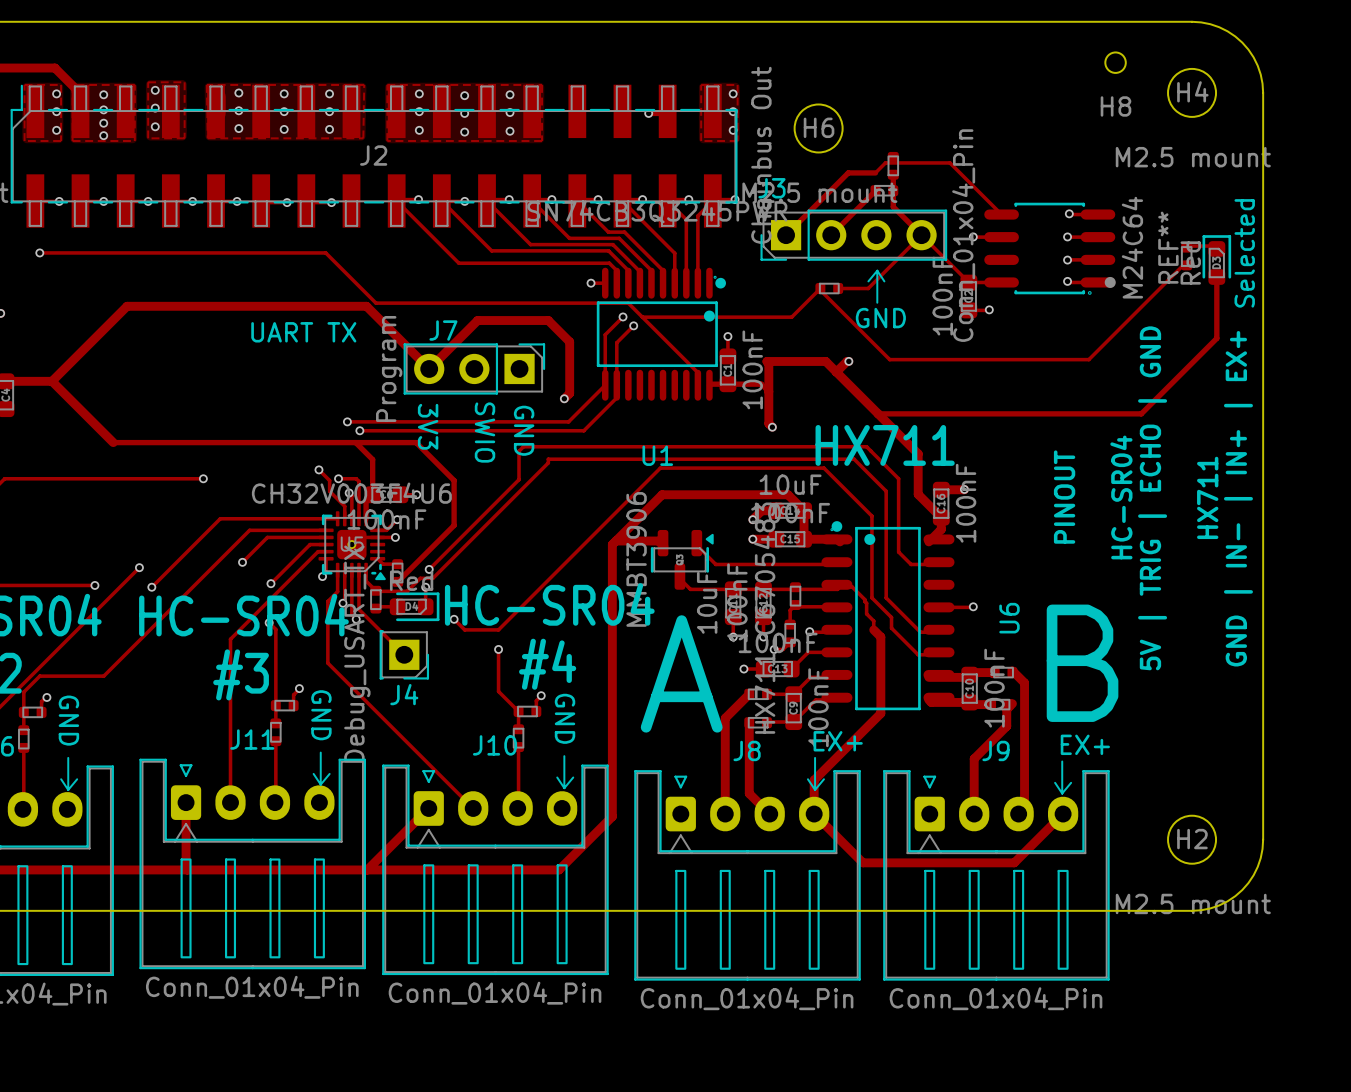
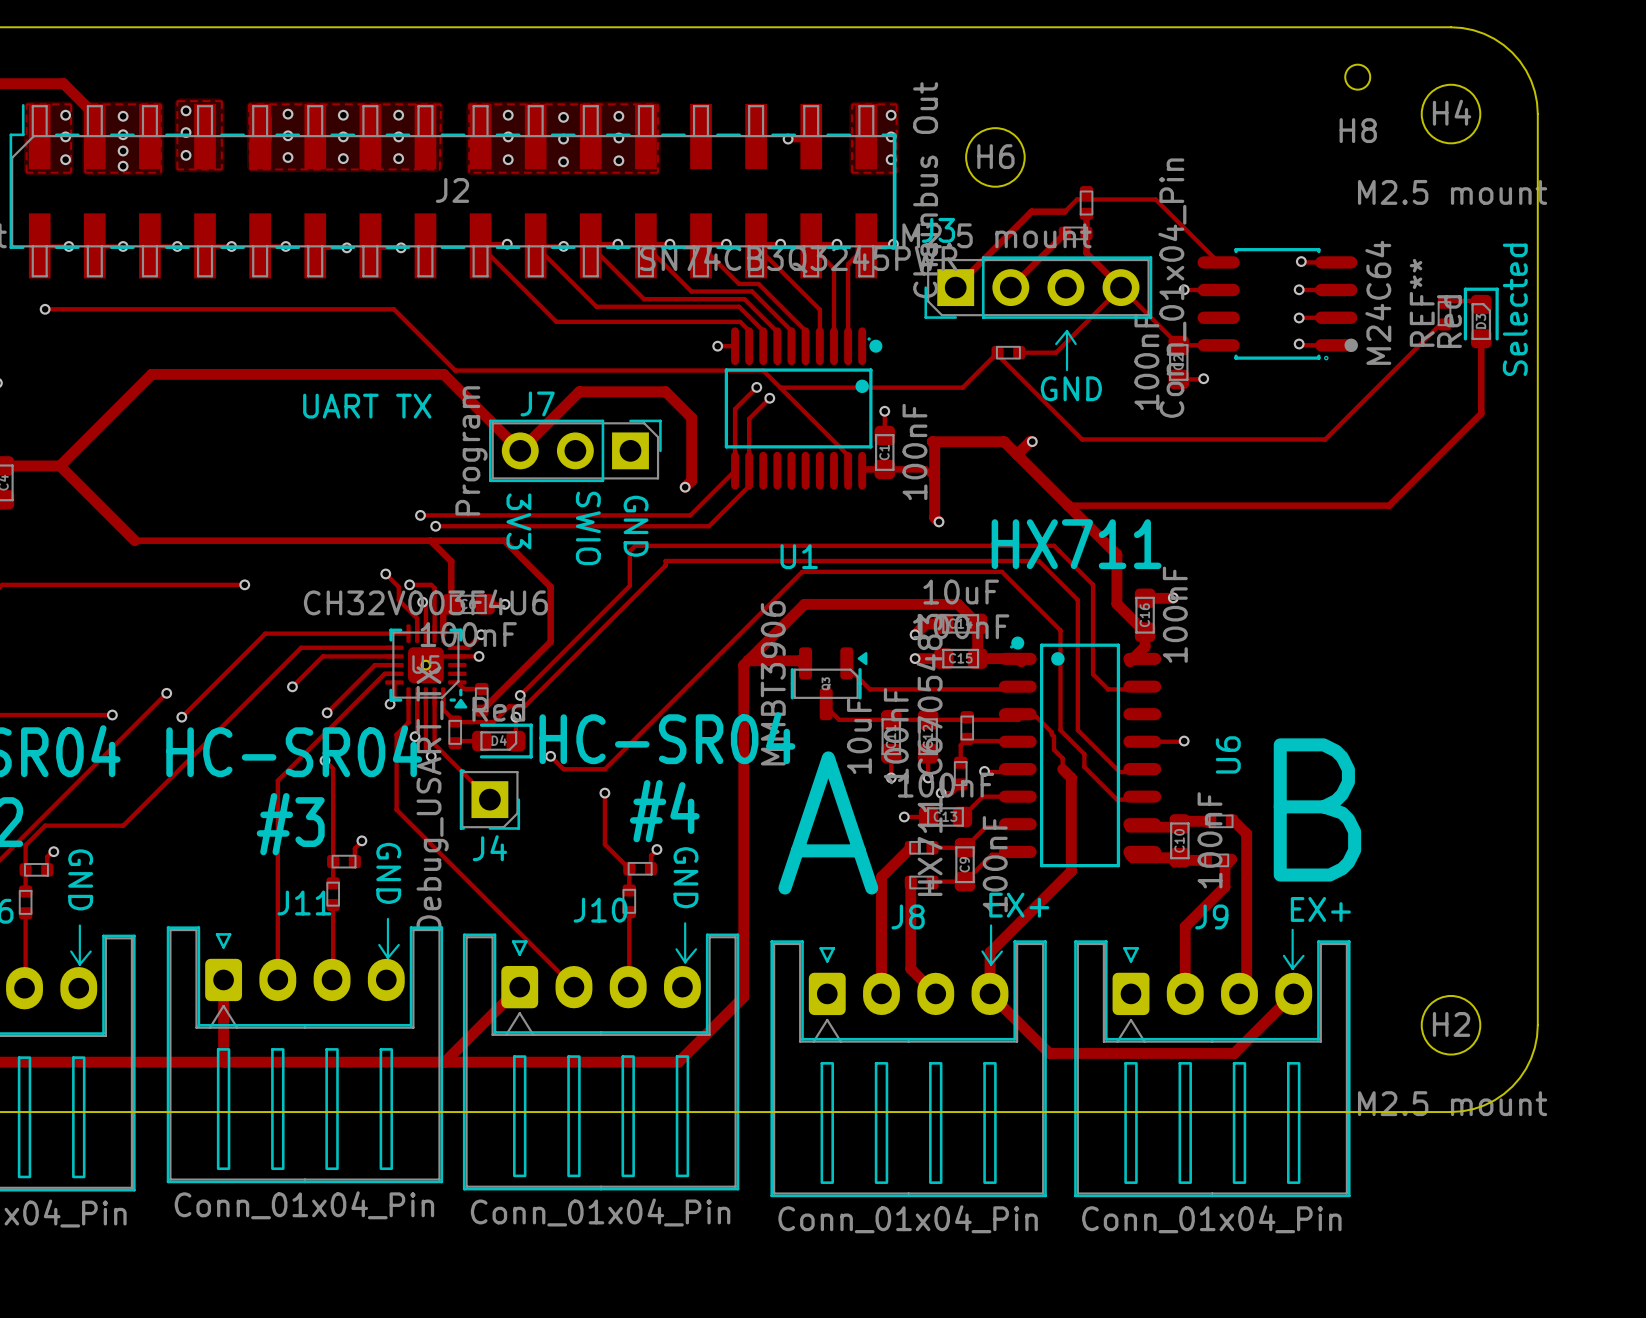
text: PINOUT (1064, 497) -> none
text: HC-SR04 (1121, 497) -> none
text: HX711 (1207, 497) -> none
text: 5V | TRIG | ECHO | GND (1152, 498) -> none
text: GND | IN- | IN+ | EX+ (1238, 498) -> none

